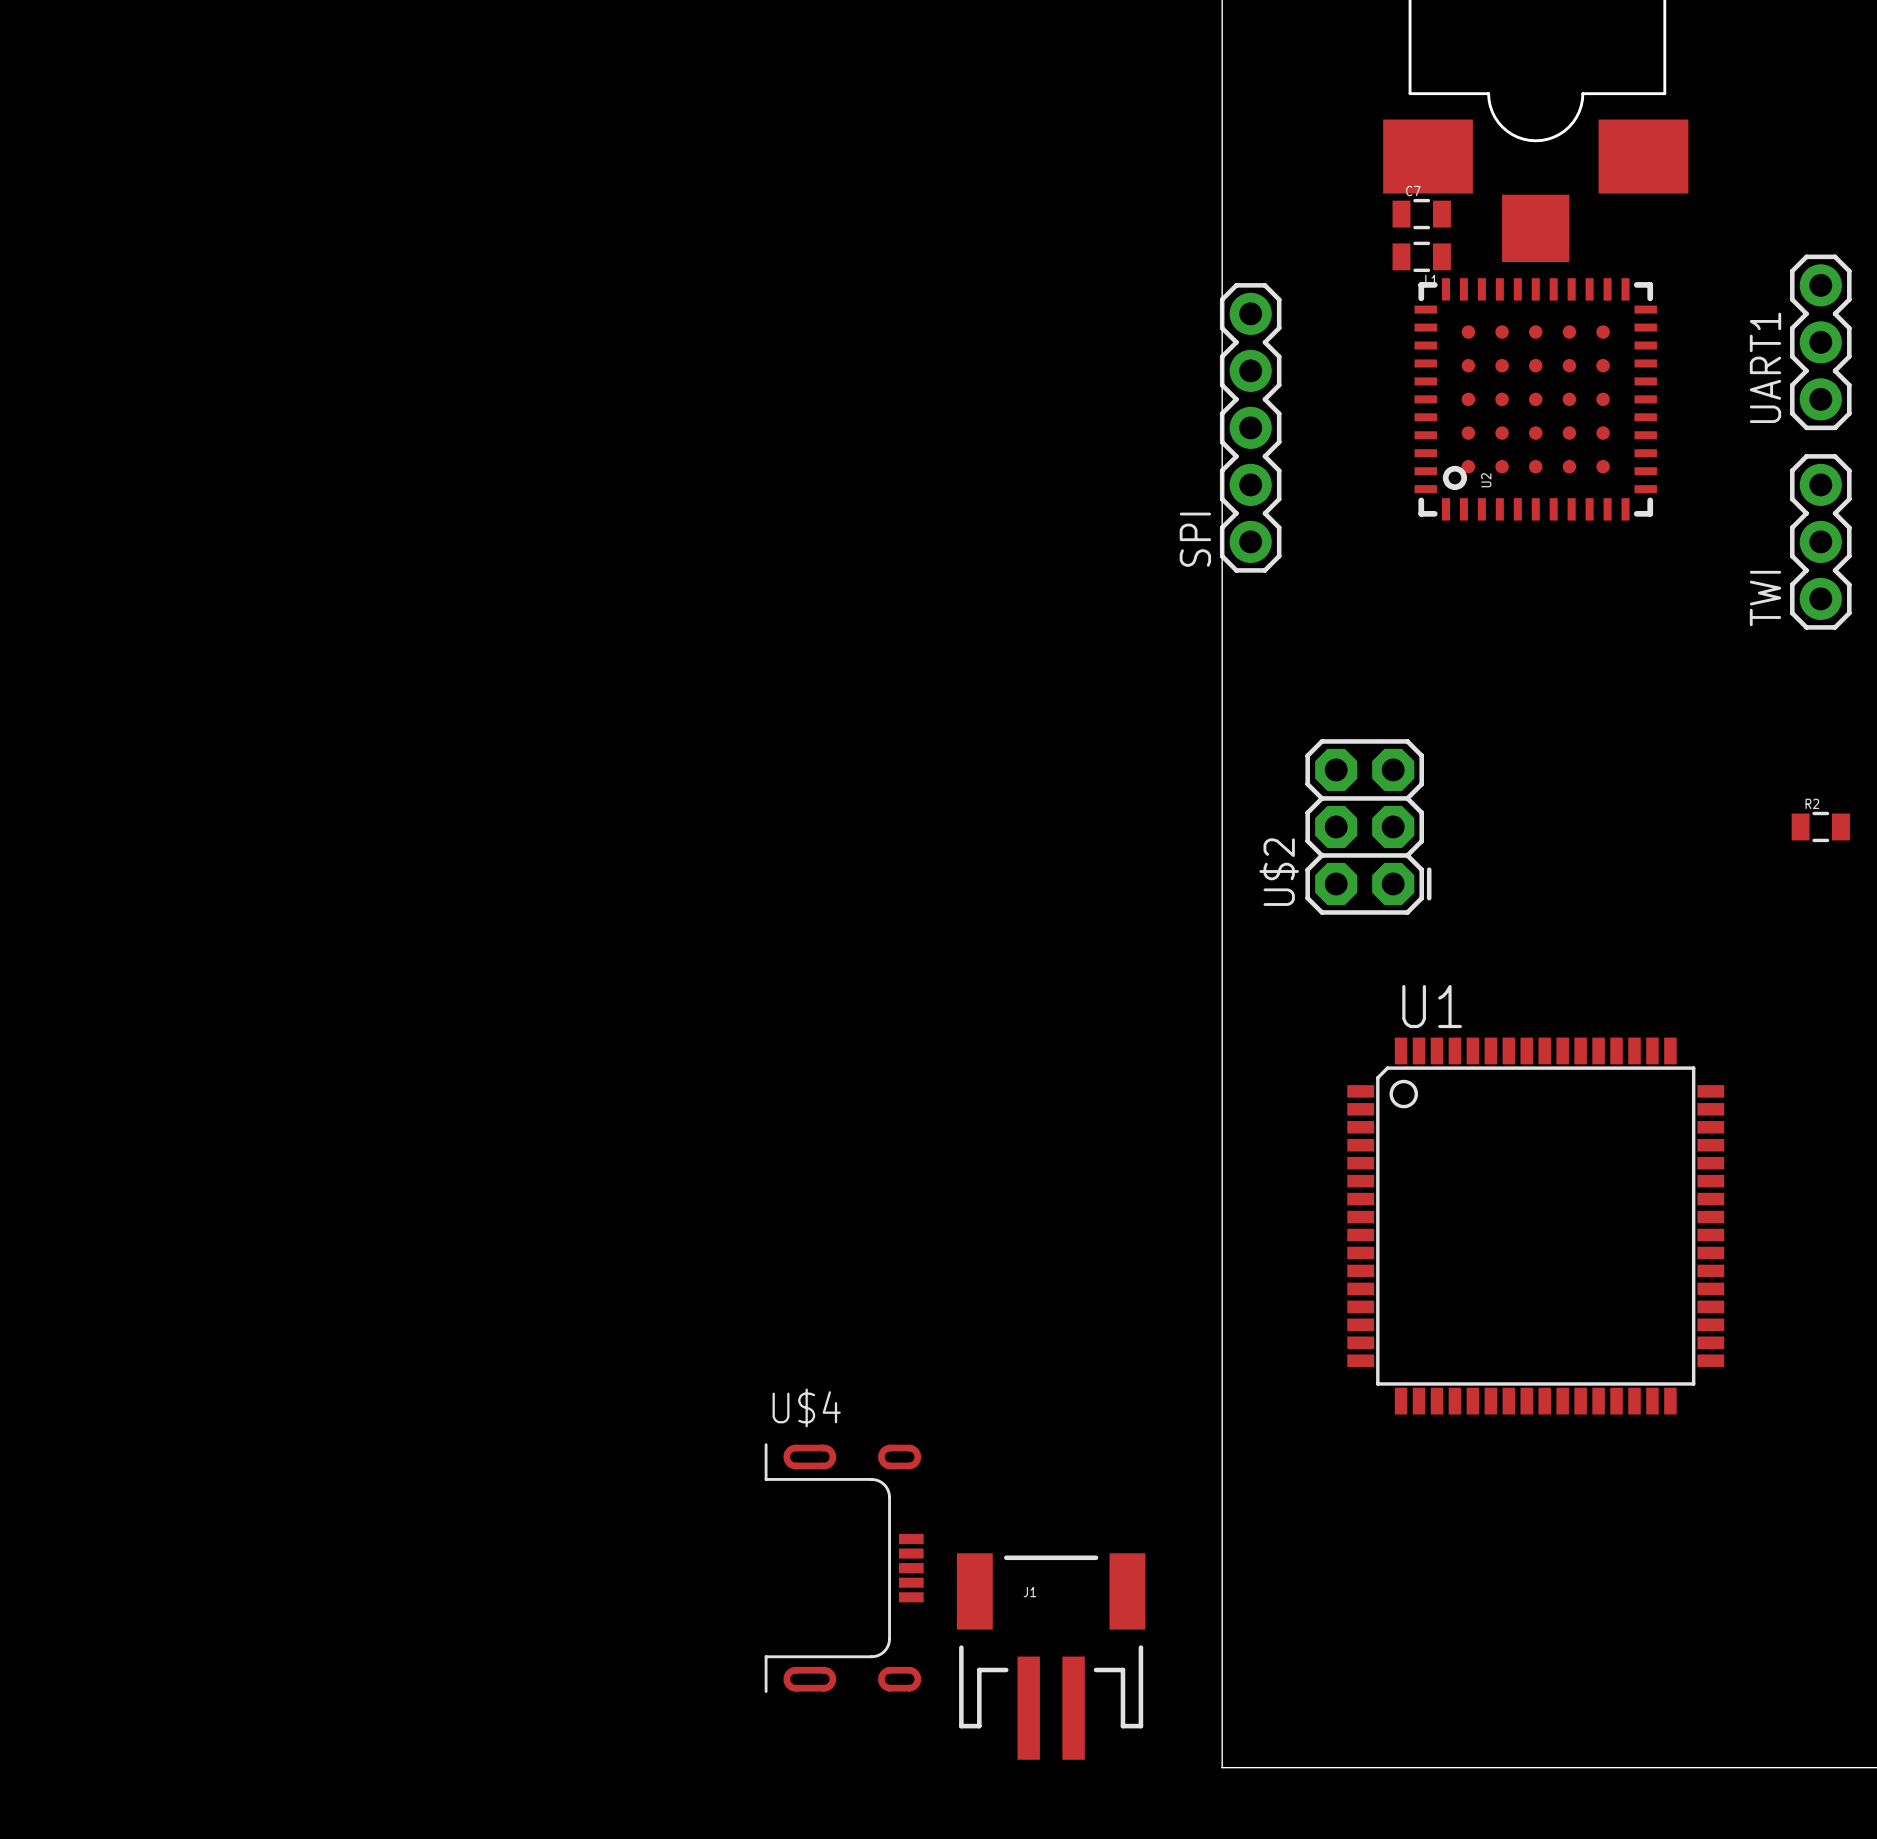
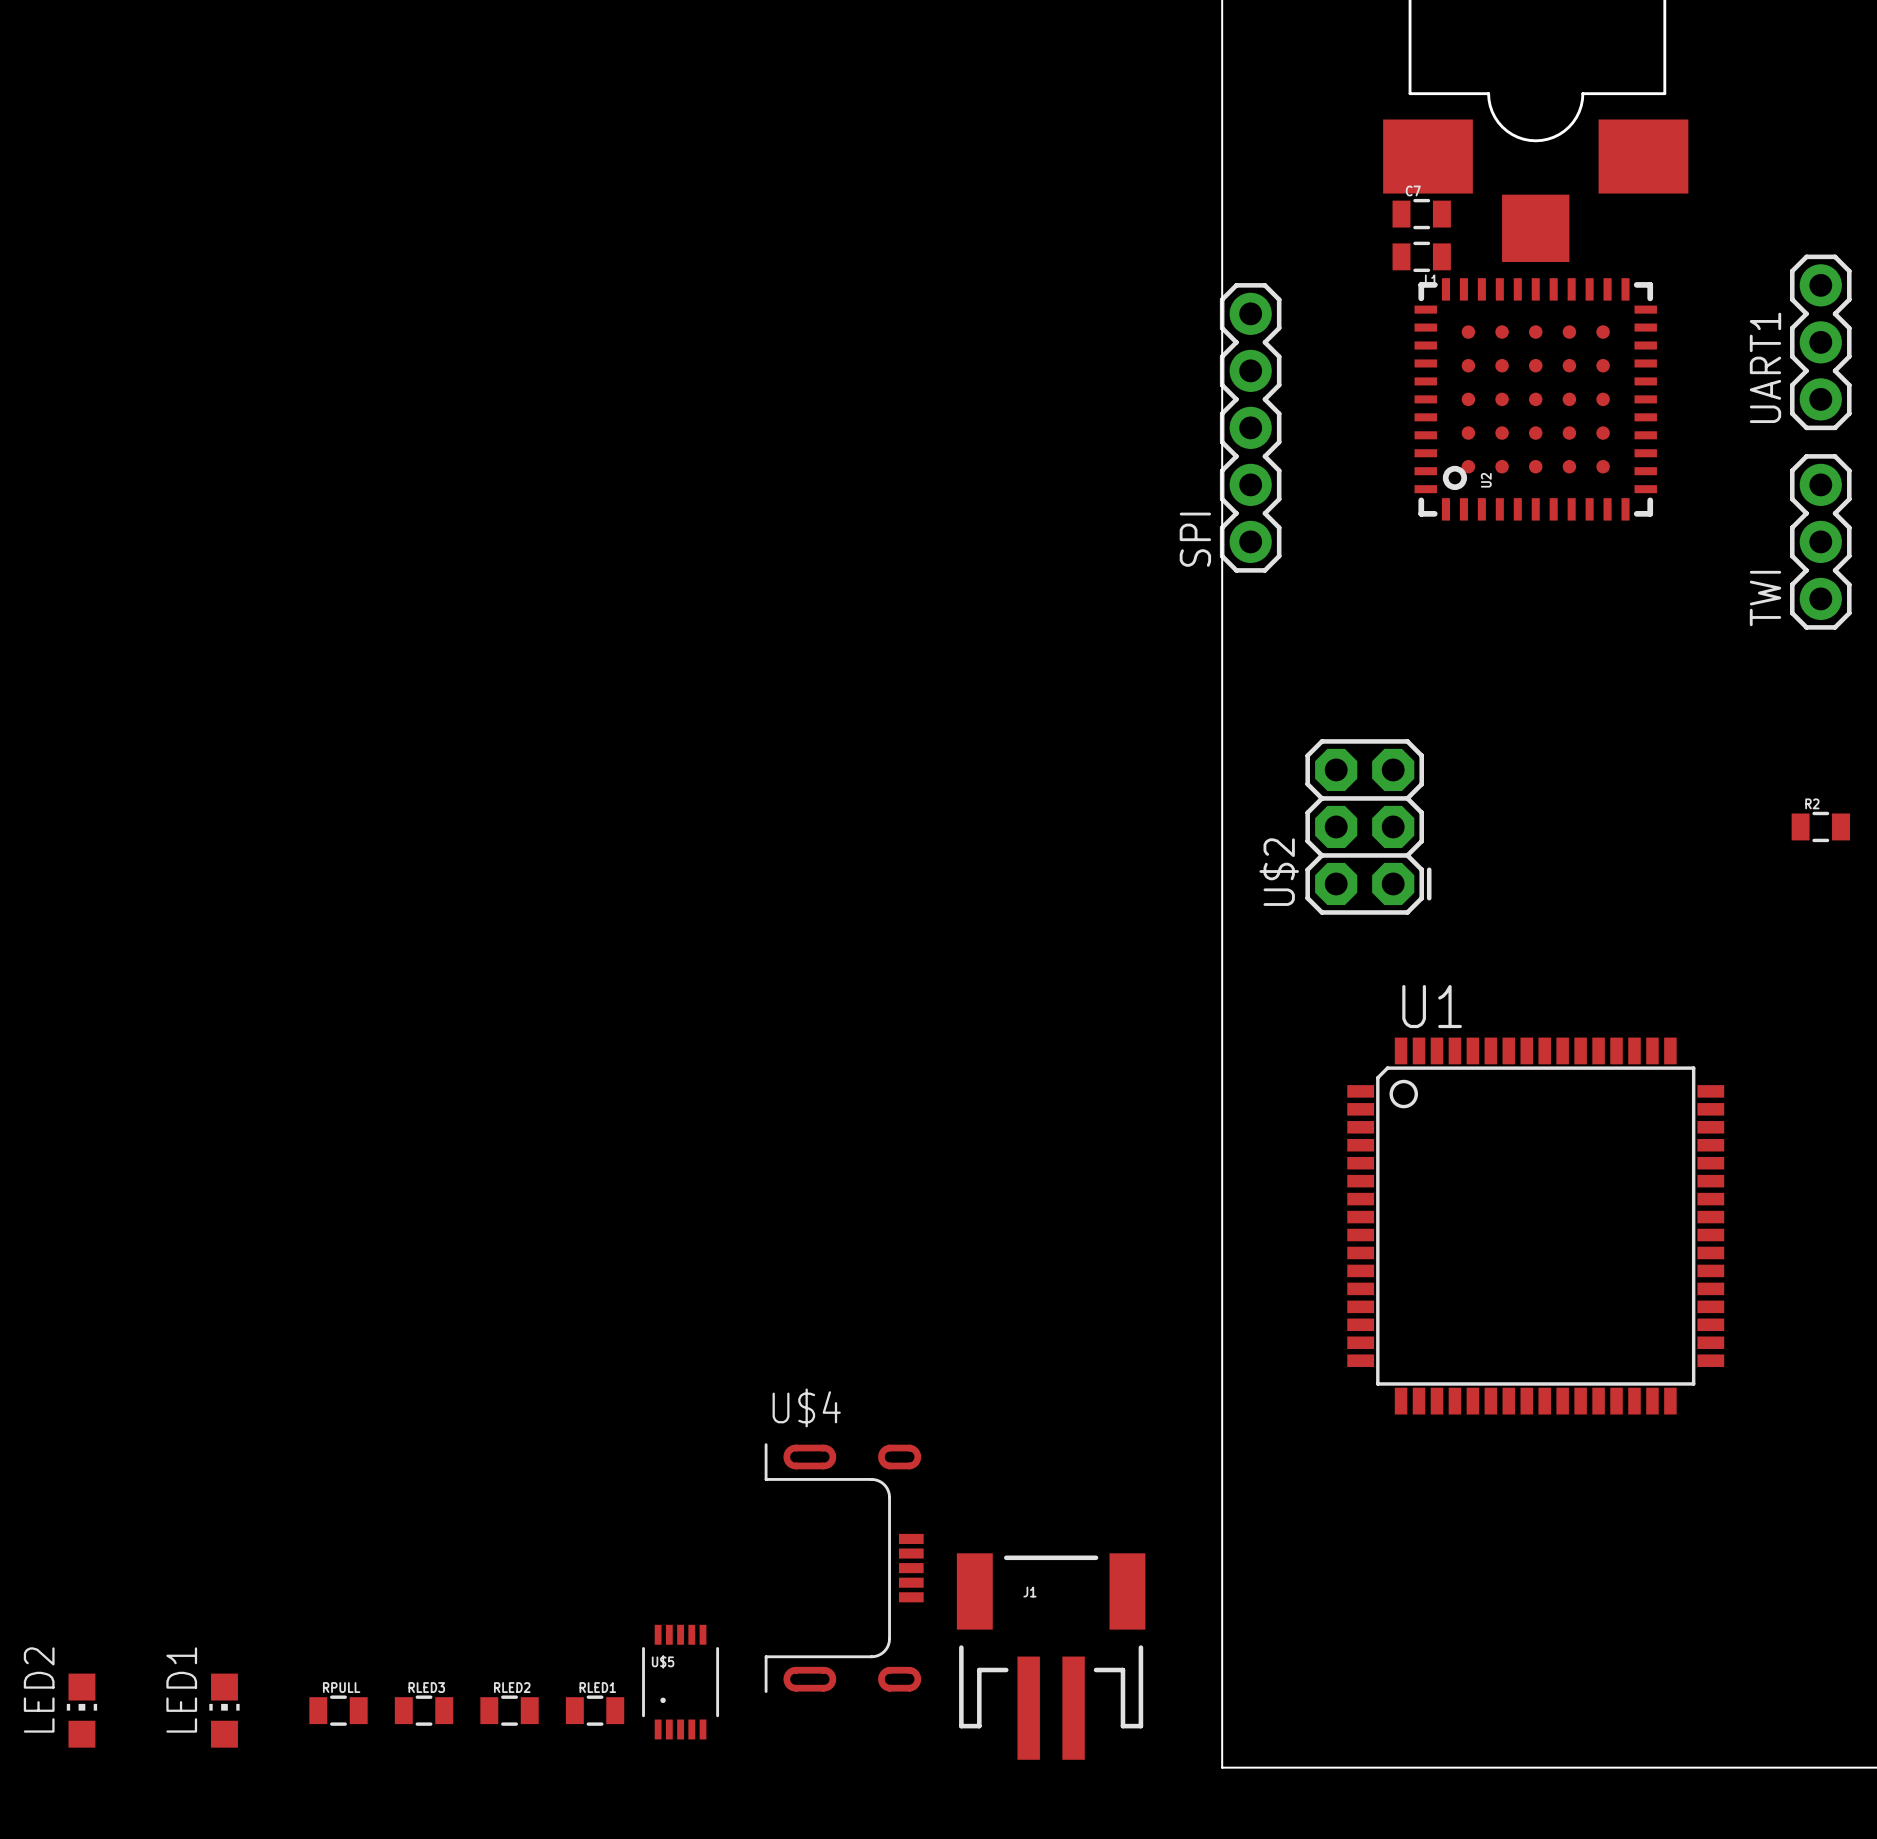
U$5: none -> (680, 1682)
LED2: none -> (81, 1710)
LED1: none -> (224, 1710)
RPULL: none -> (338, 1710)
RLED3: none -> (424, 1710)
RLED2: none -> (509, 1710)
RLED1: none -> (595, 1710)

